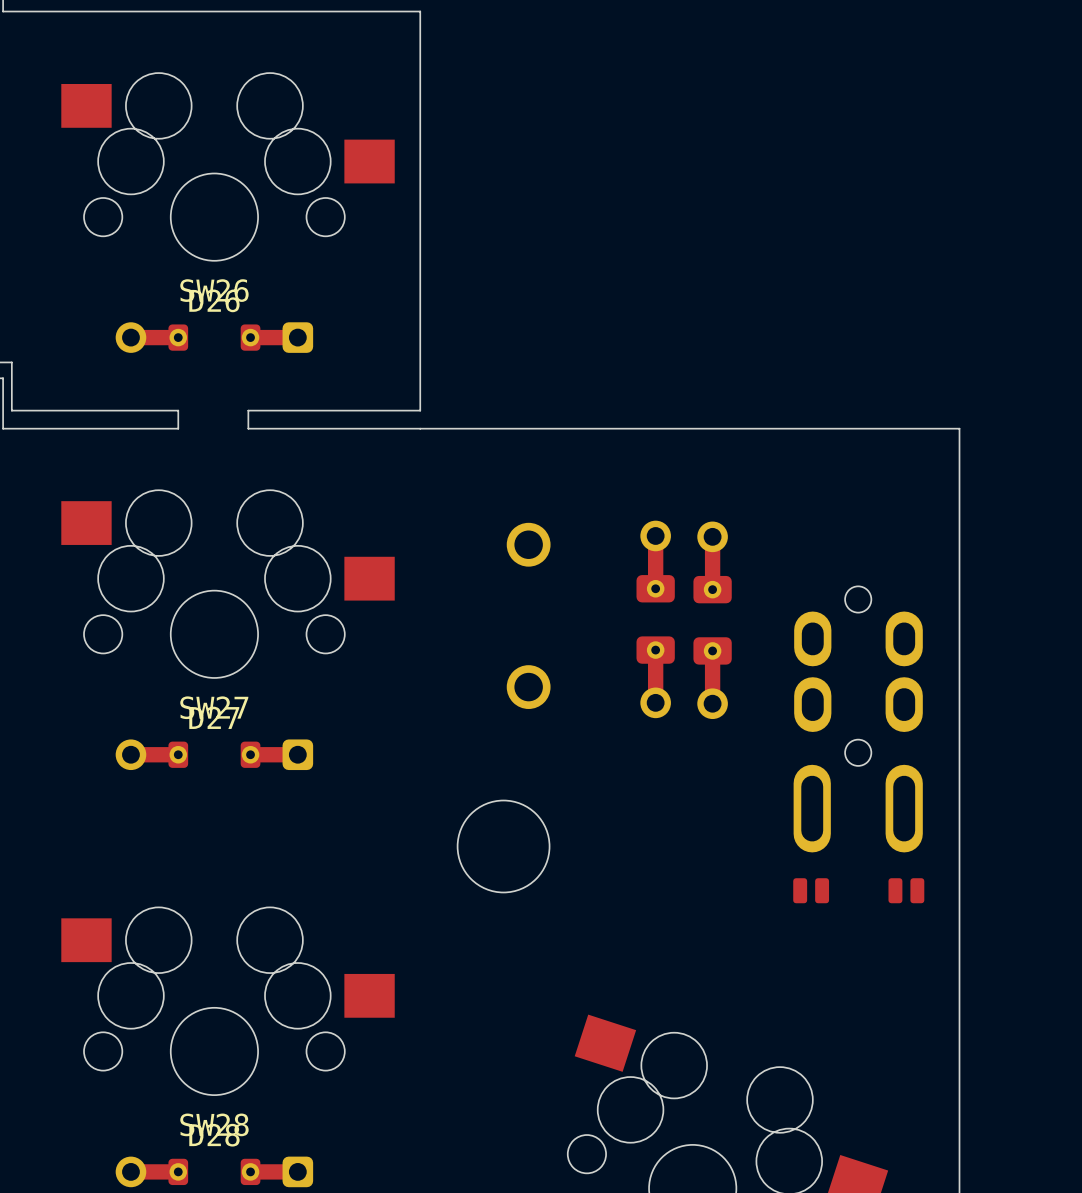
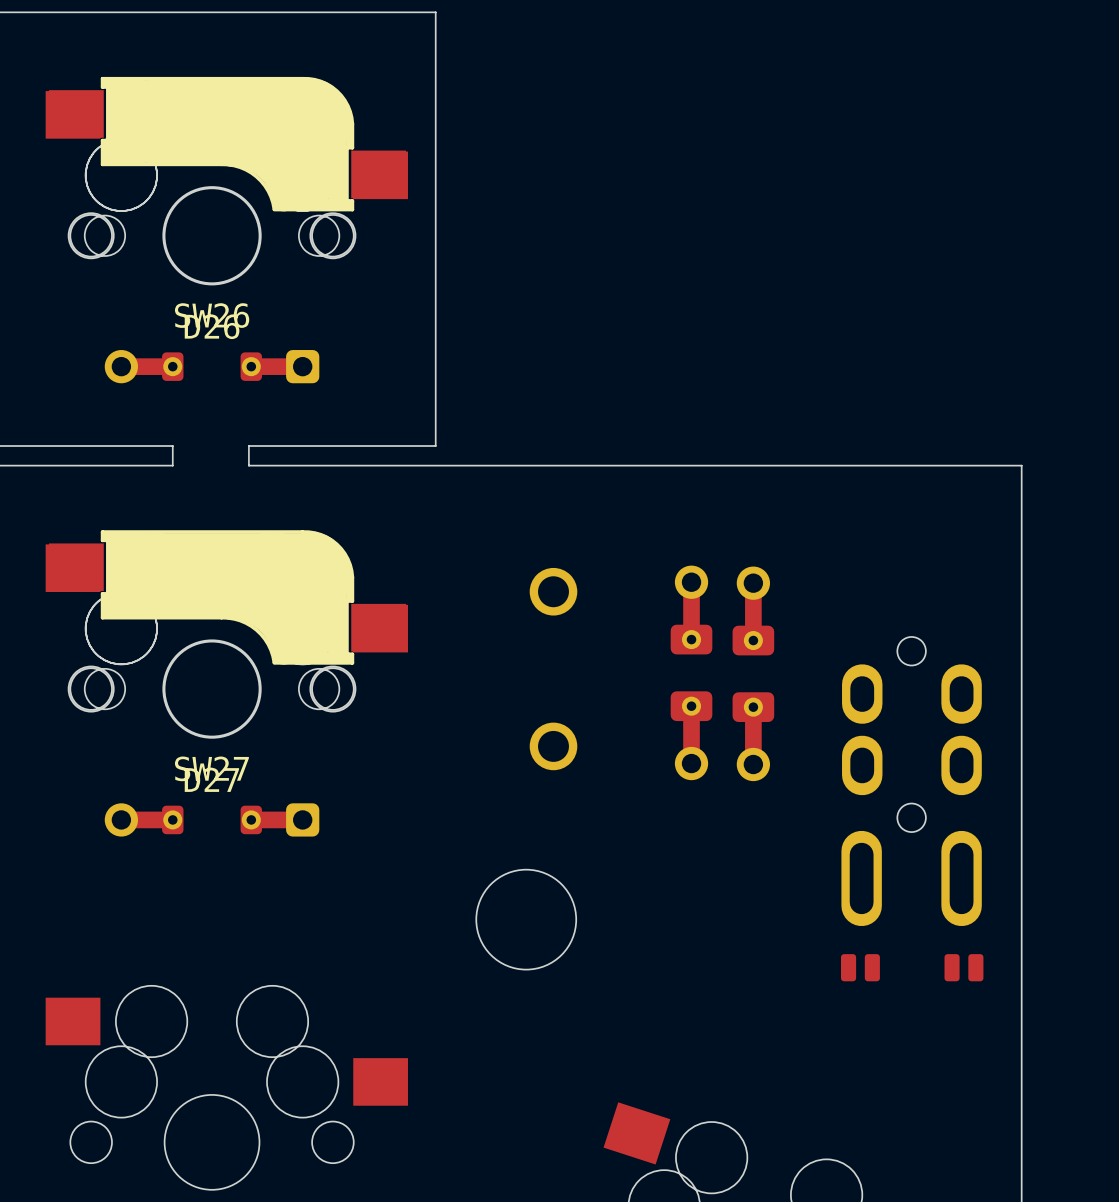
part: none -> (227, 180)
part: none -> (227, 634)

